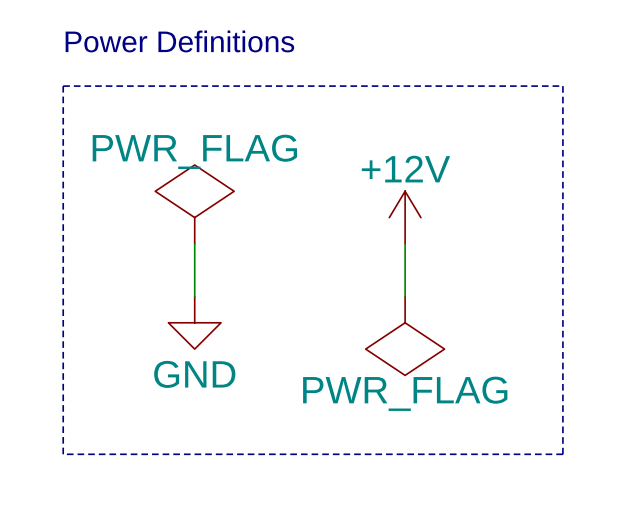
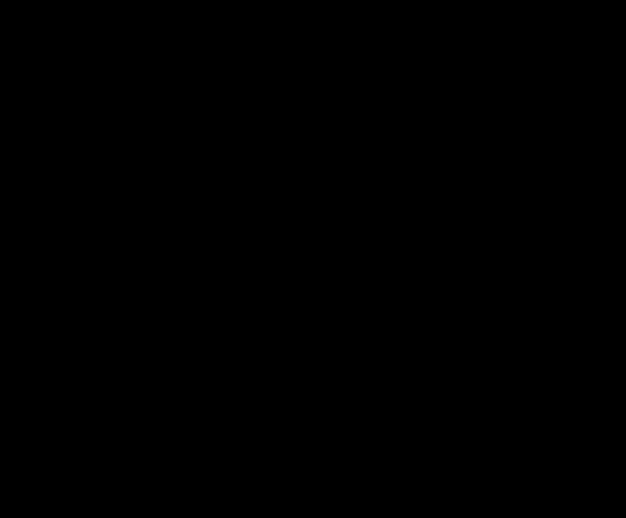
text: Power Definitions (179, 41) -> none
line: (63, 86) (63, 454) (562, 454) (562, 86) (63, 86) -> none
power symbol: PWR_FLAG (194, 204) -> none
power symbol: +12V (405, 217) -> none
wire: (194, 243) (194, 296) -> none
wire: (405, 243) (405, 296) -> none
power symbol: GND (194, 322) -> none
power symbol: PWR_FLAG (405, 335) -> none

